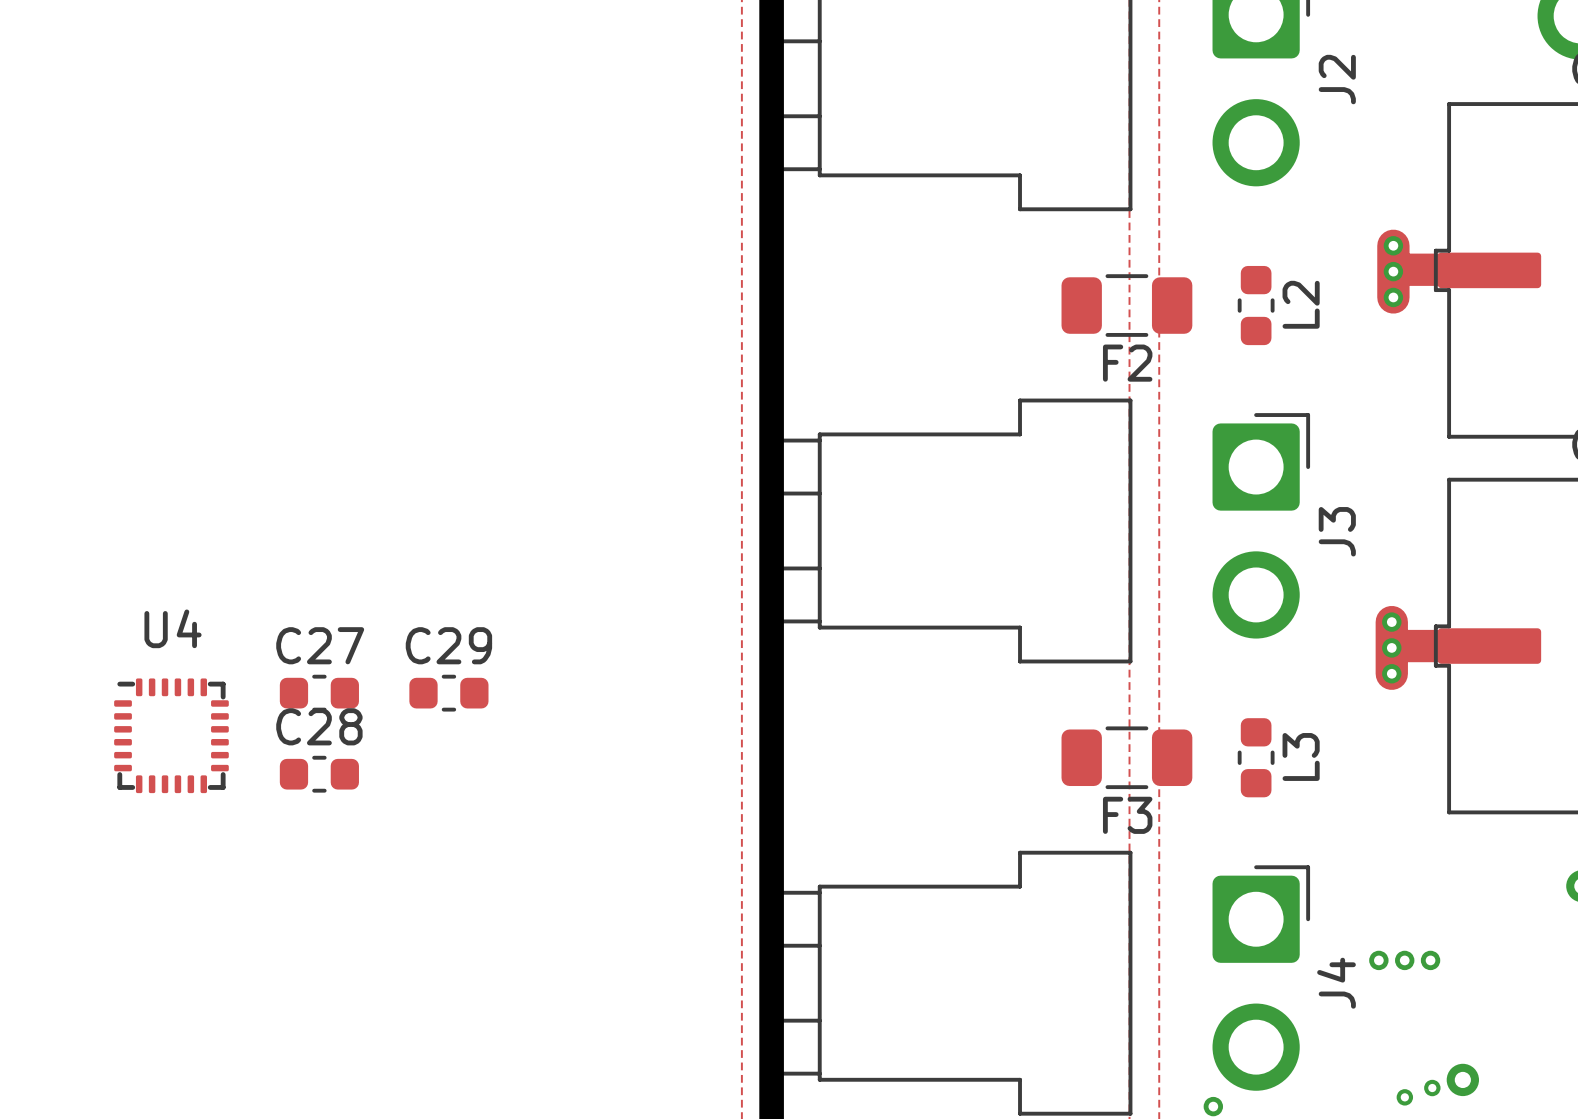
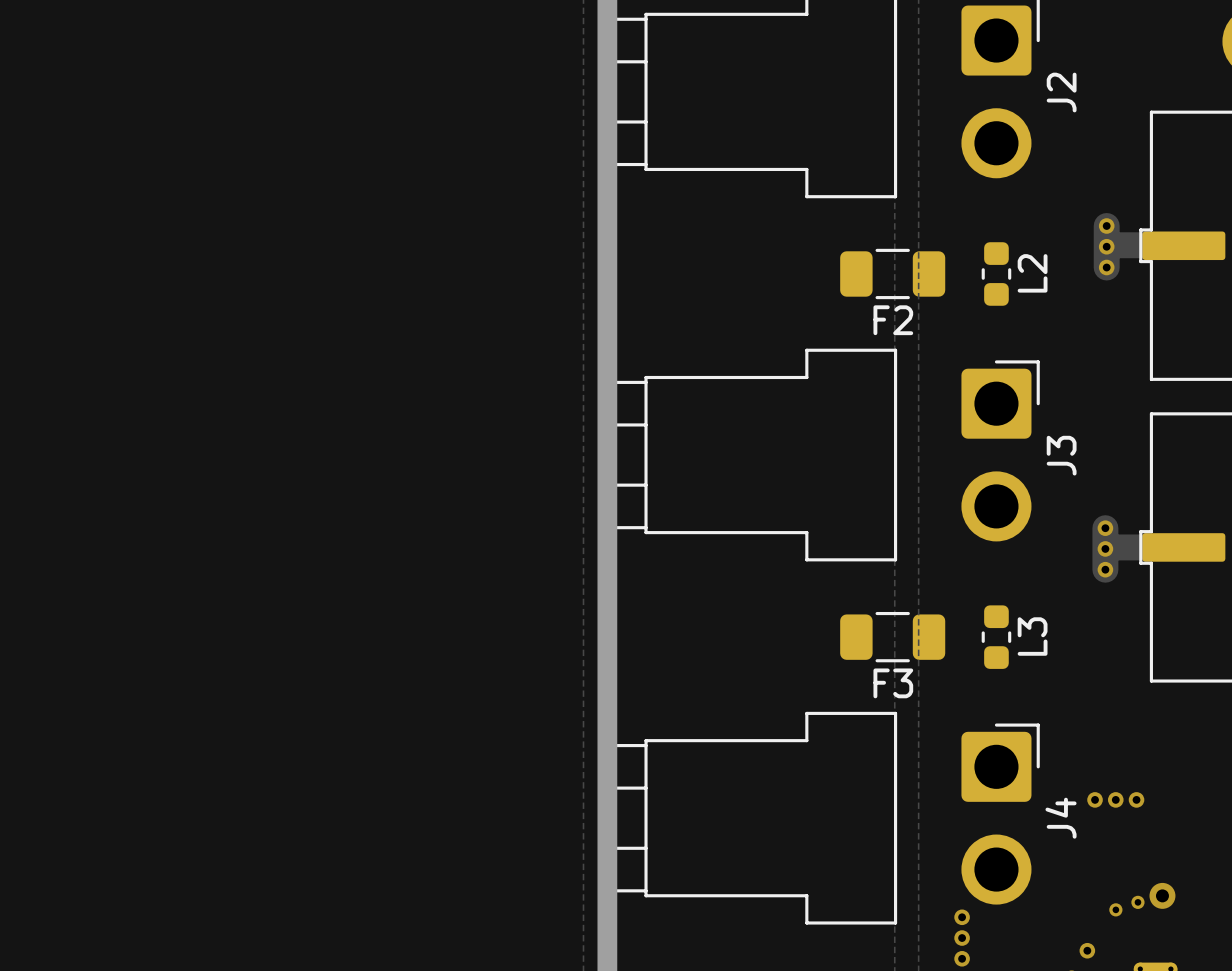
C27: (319, 693) -> none
C29: (448, 693) -> none
U4: (171, 735) -> none
C28: (319, 774) -> none

